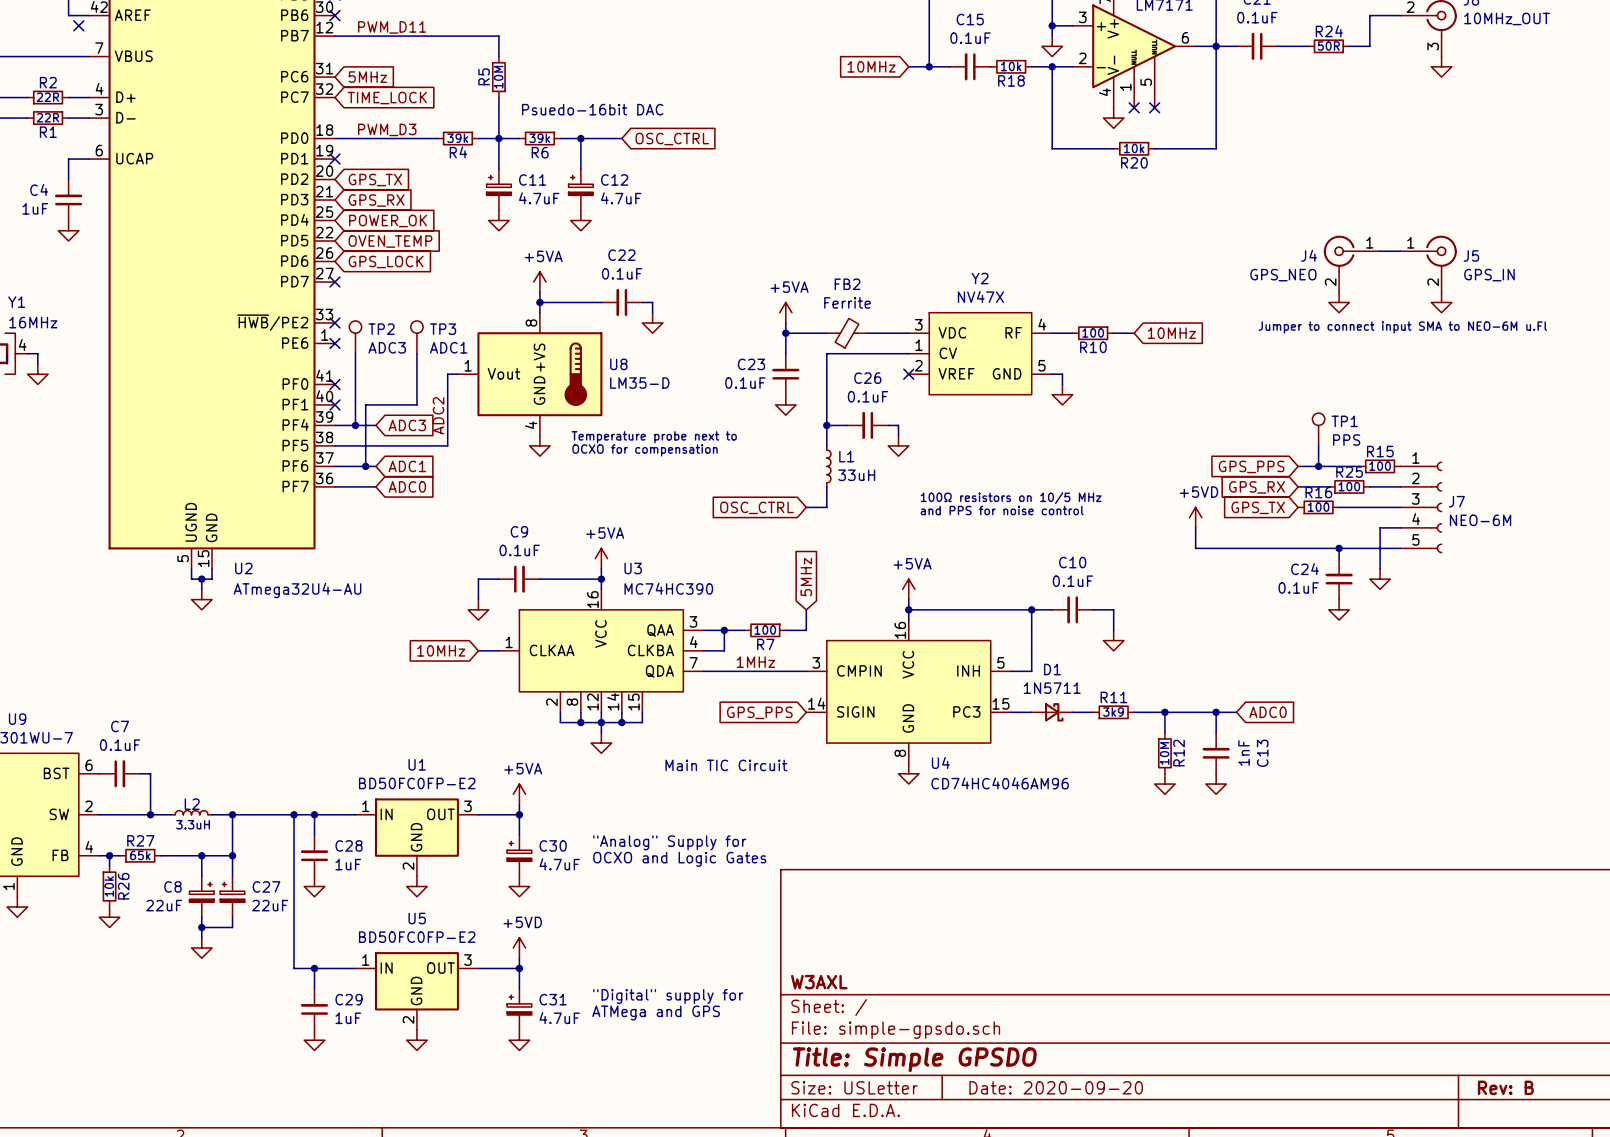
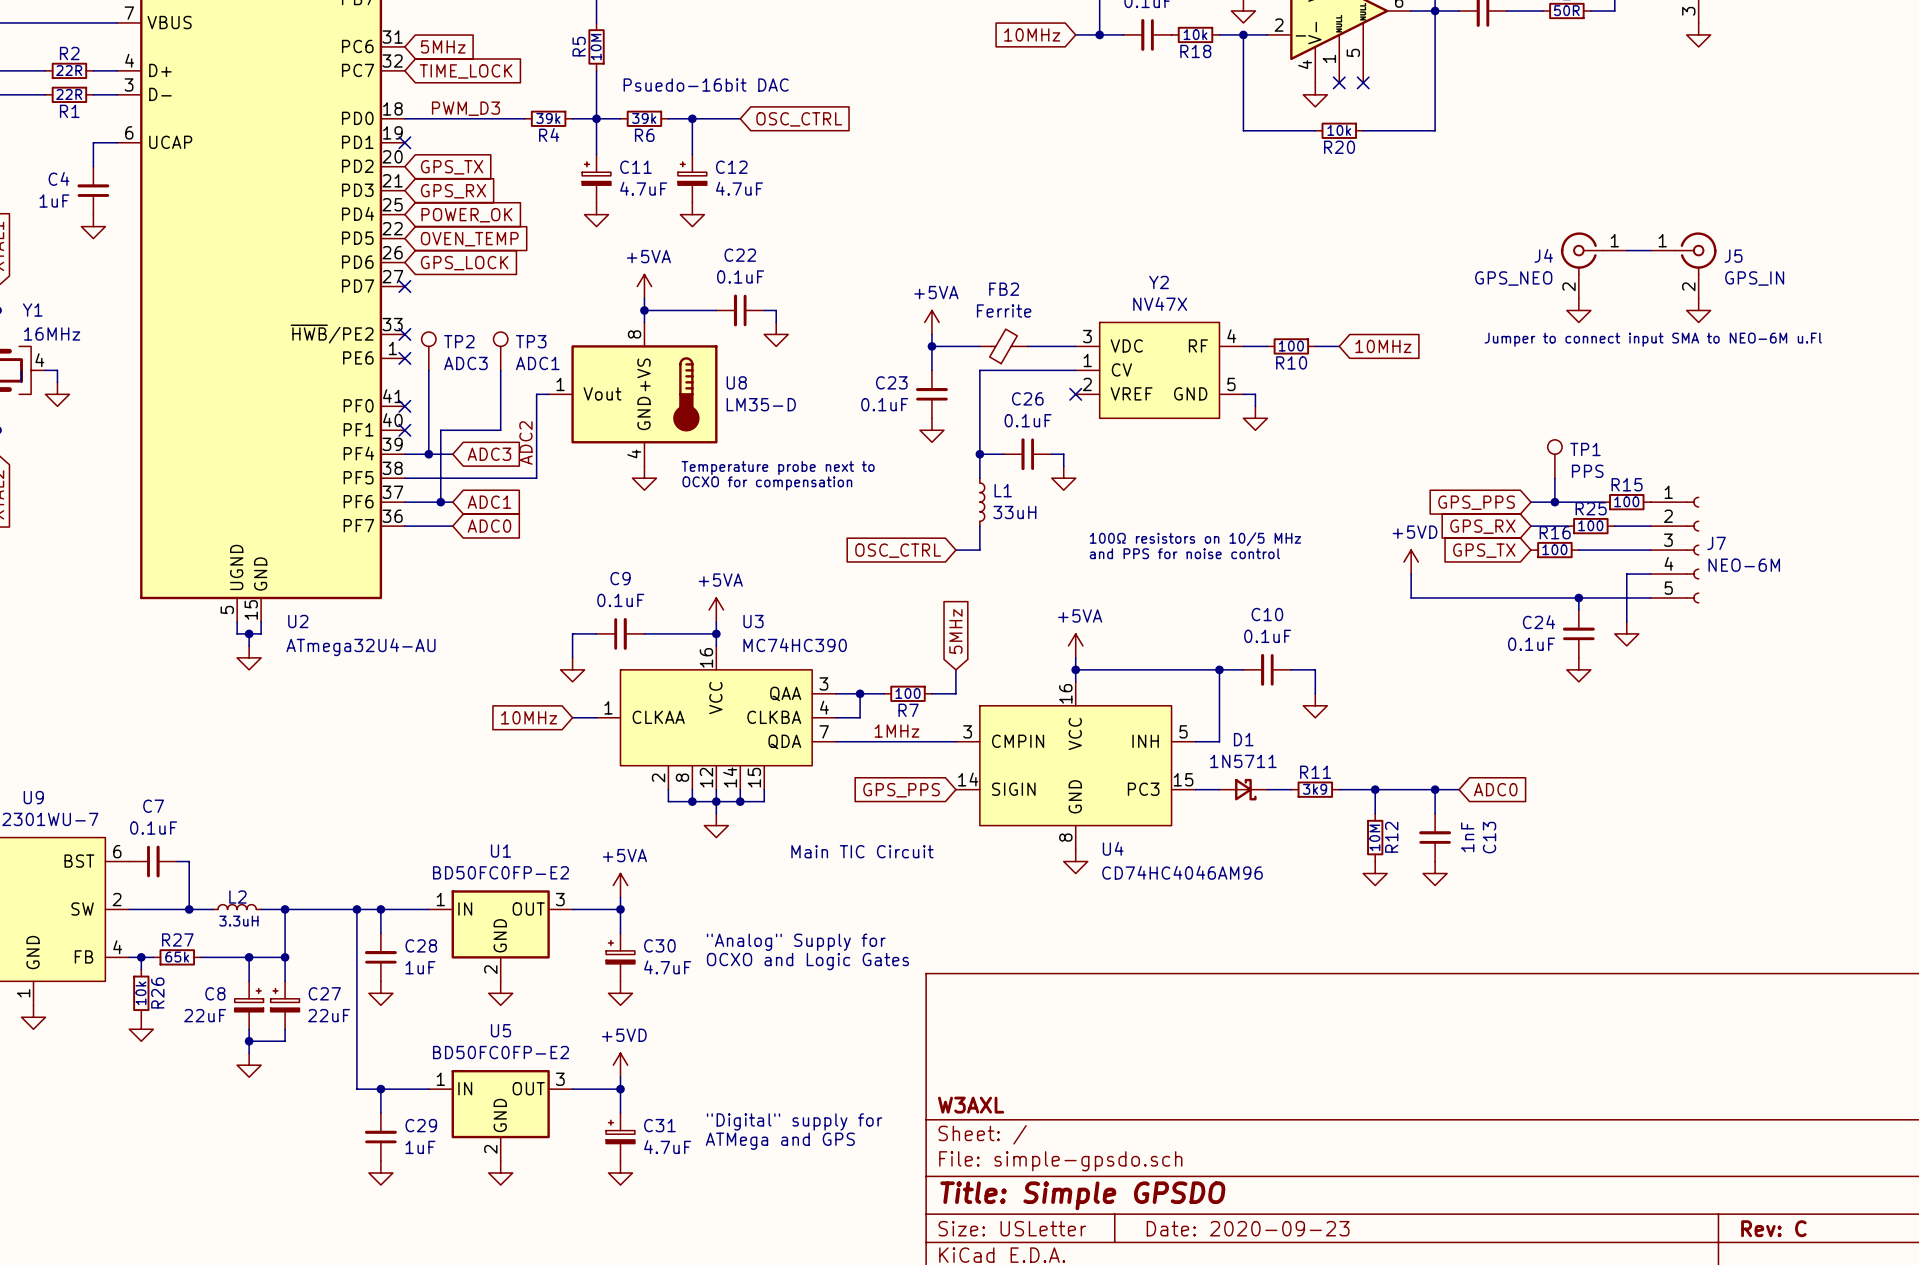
title block: Date: 2020-09-20 (1056, 1087) -> Date: 2020-09-23 (1248, 1228)
title block: Rev: B (1505, 1087) -> Rev: C (1773, 1228)

